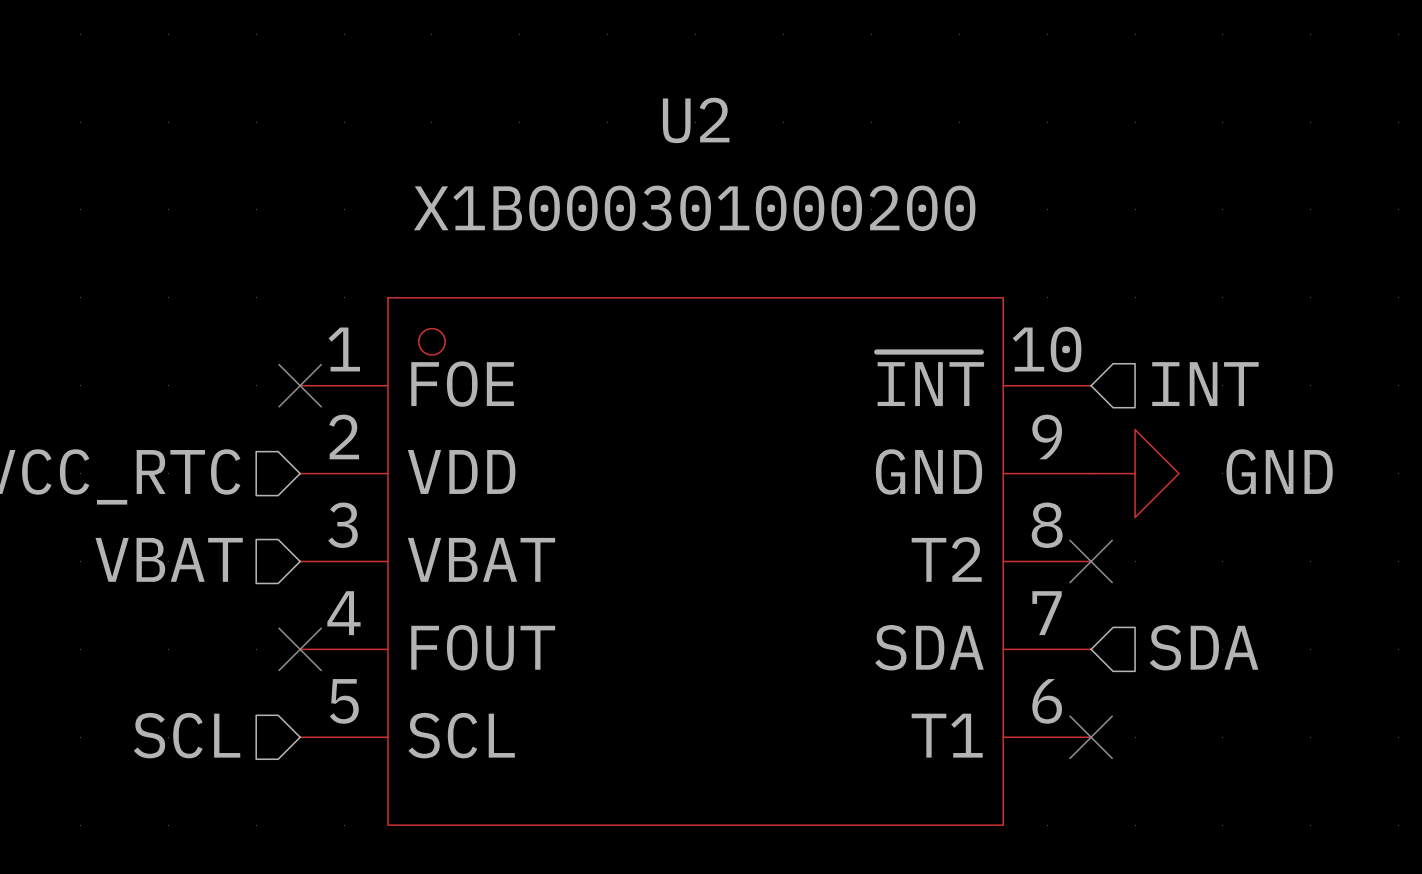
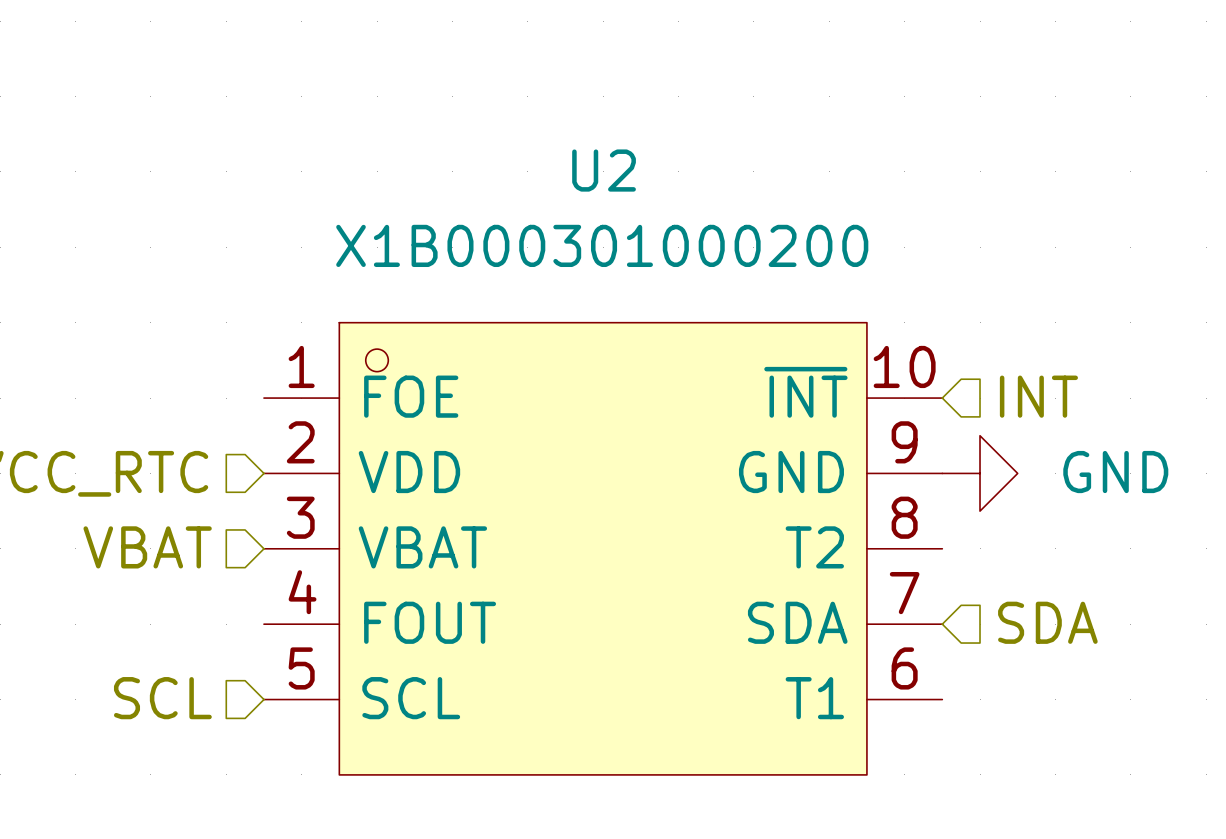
no-connect mark: (300, 385) -> none
no-connect mark: (1091, 561) -> none
no-connect mark: (300, 649) -> none
no-connect mark: (1091, 737) -> none

